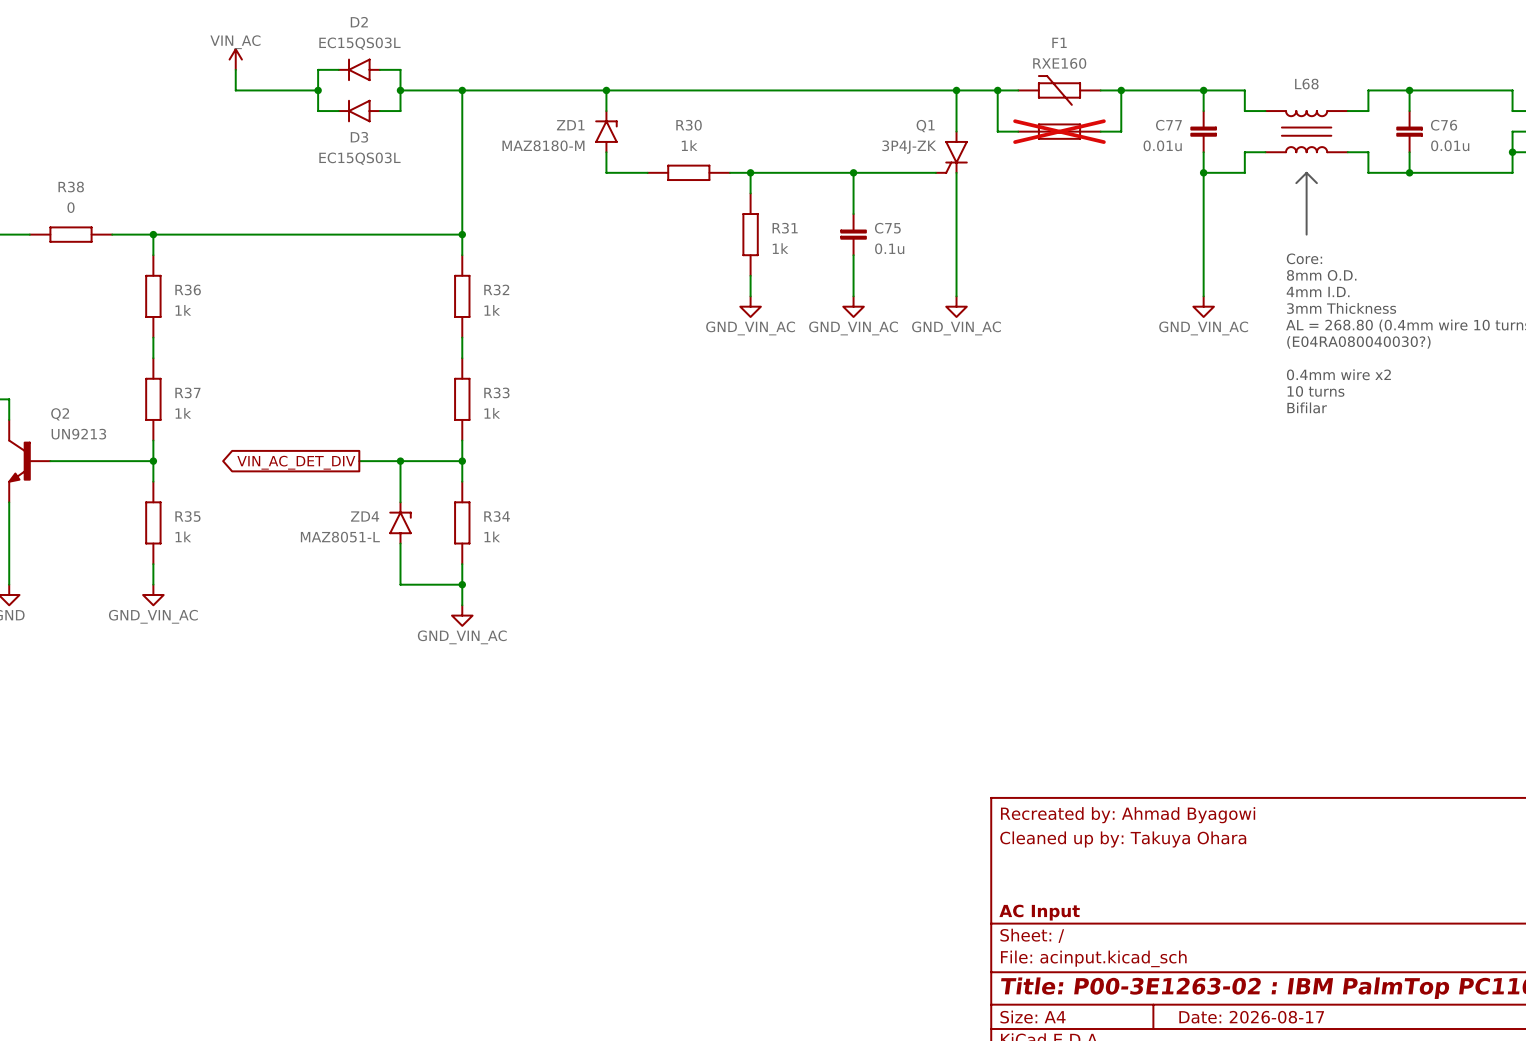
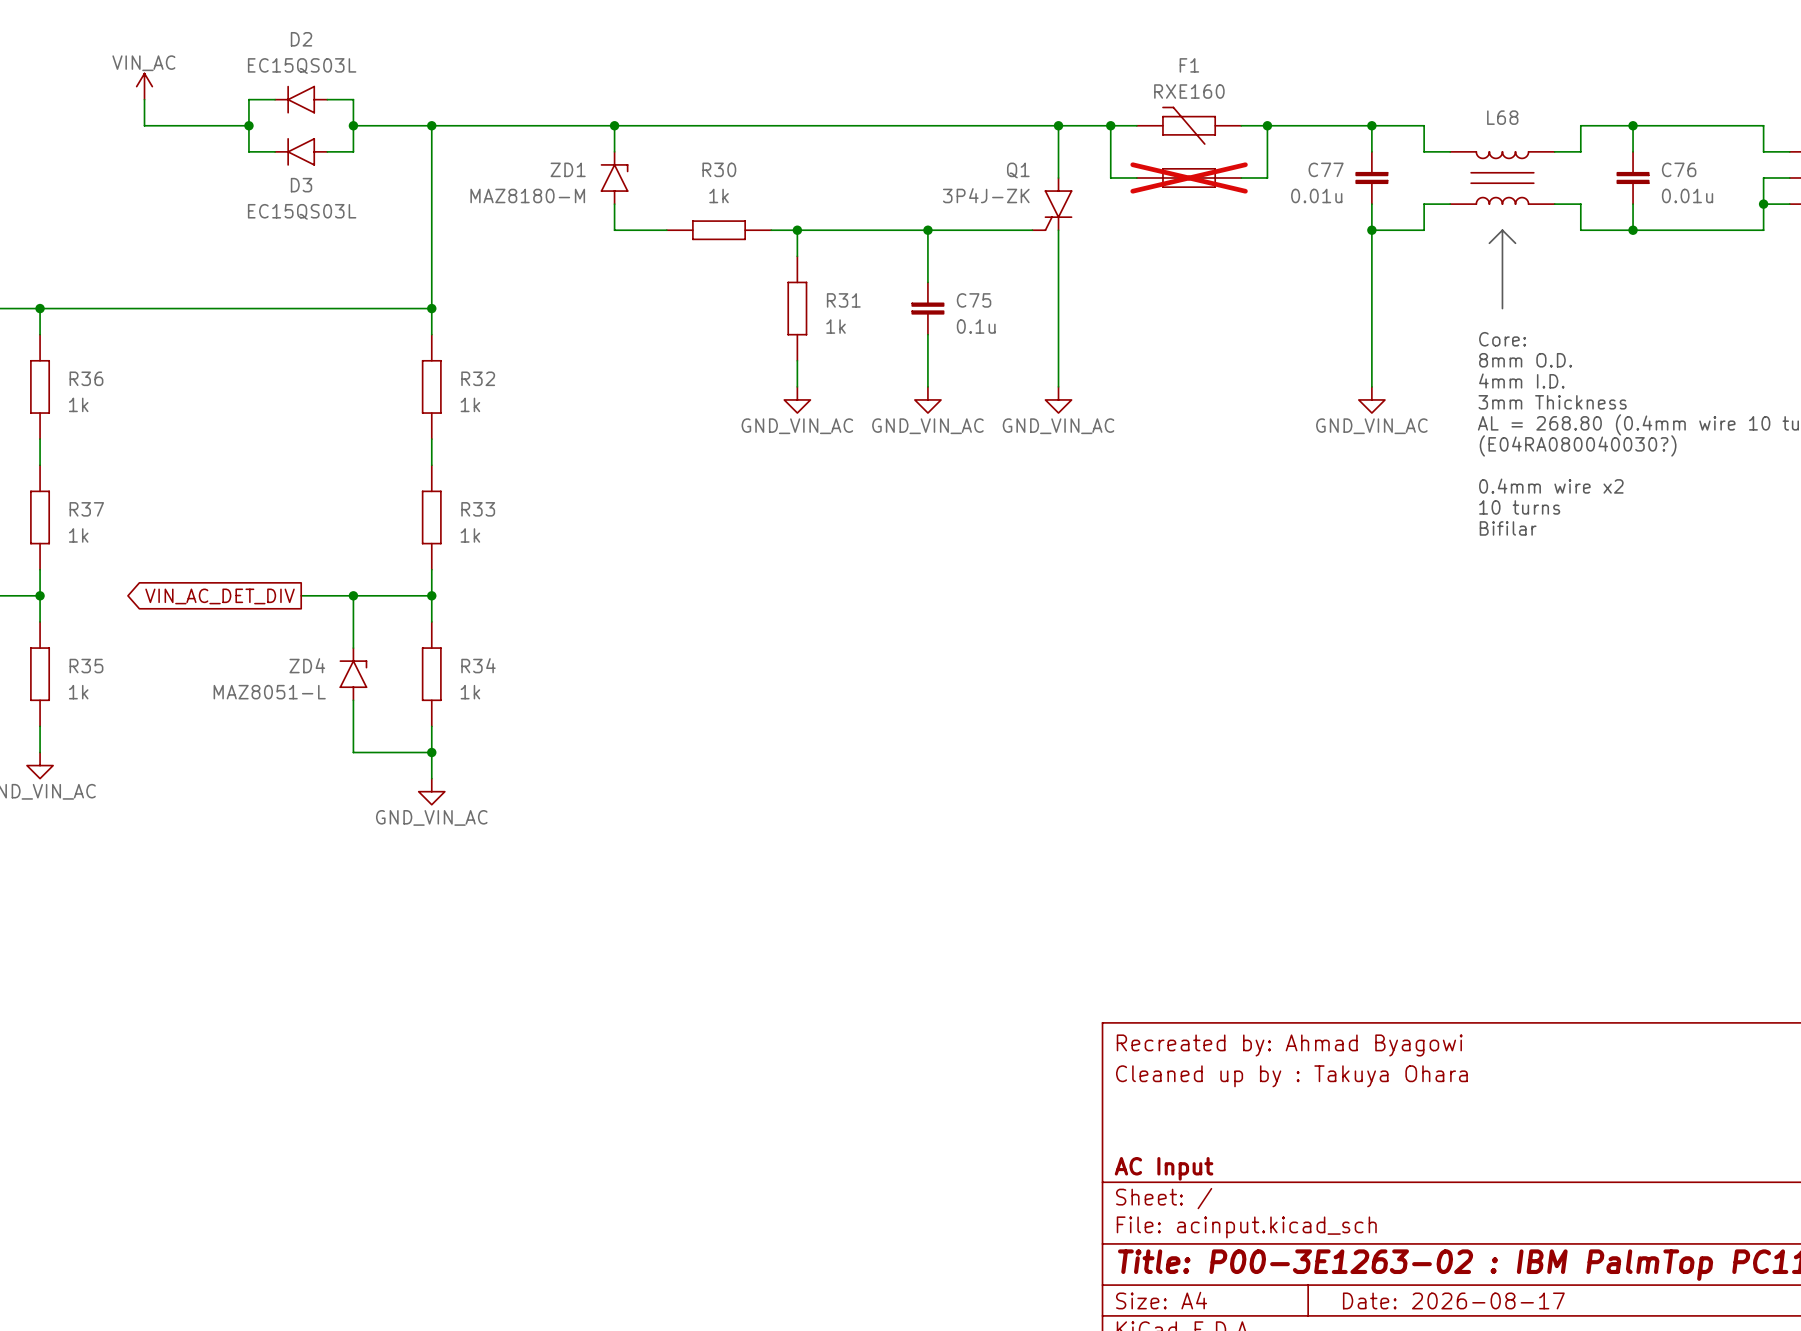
title block: Cleaned up by: Takuya Ohara (1123, 839) -> Cleaned up by : Takuya Ohara (1291, 1076)

